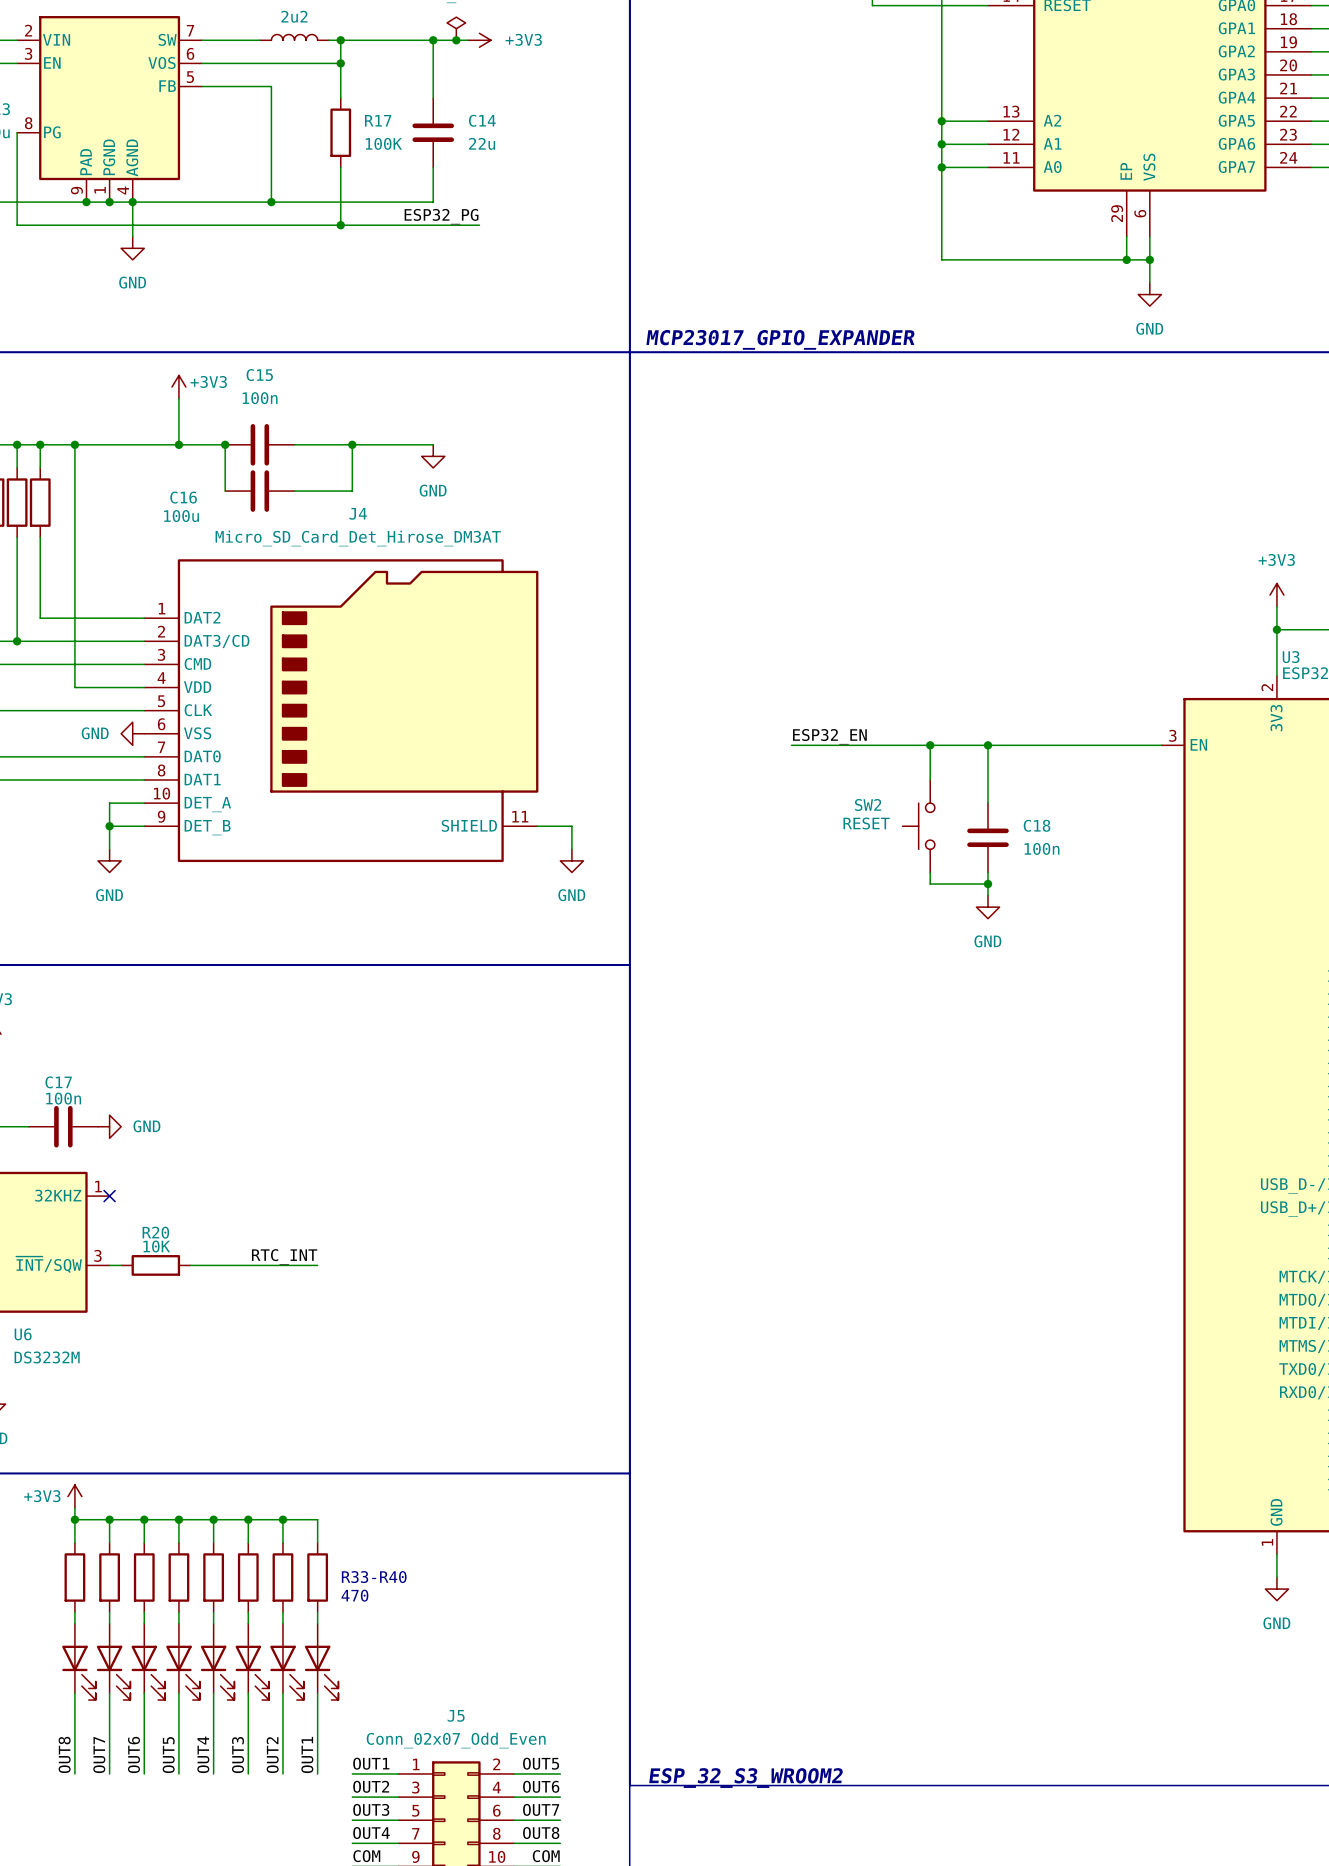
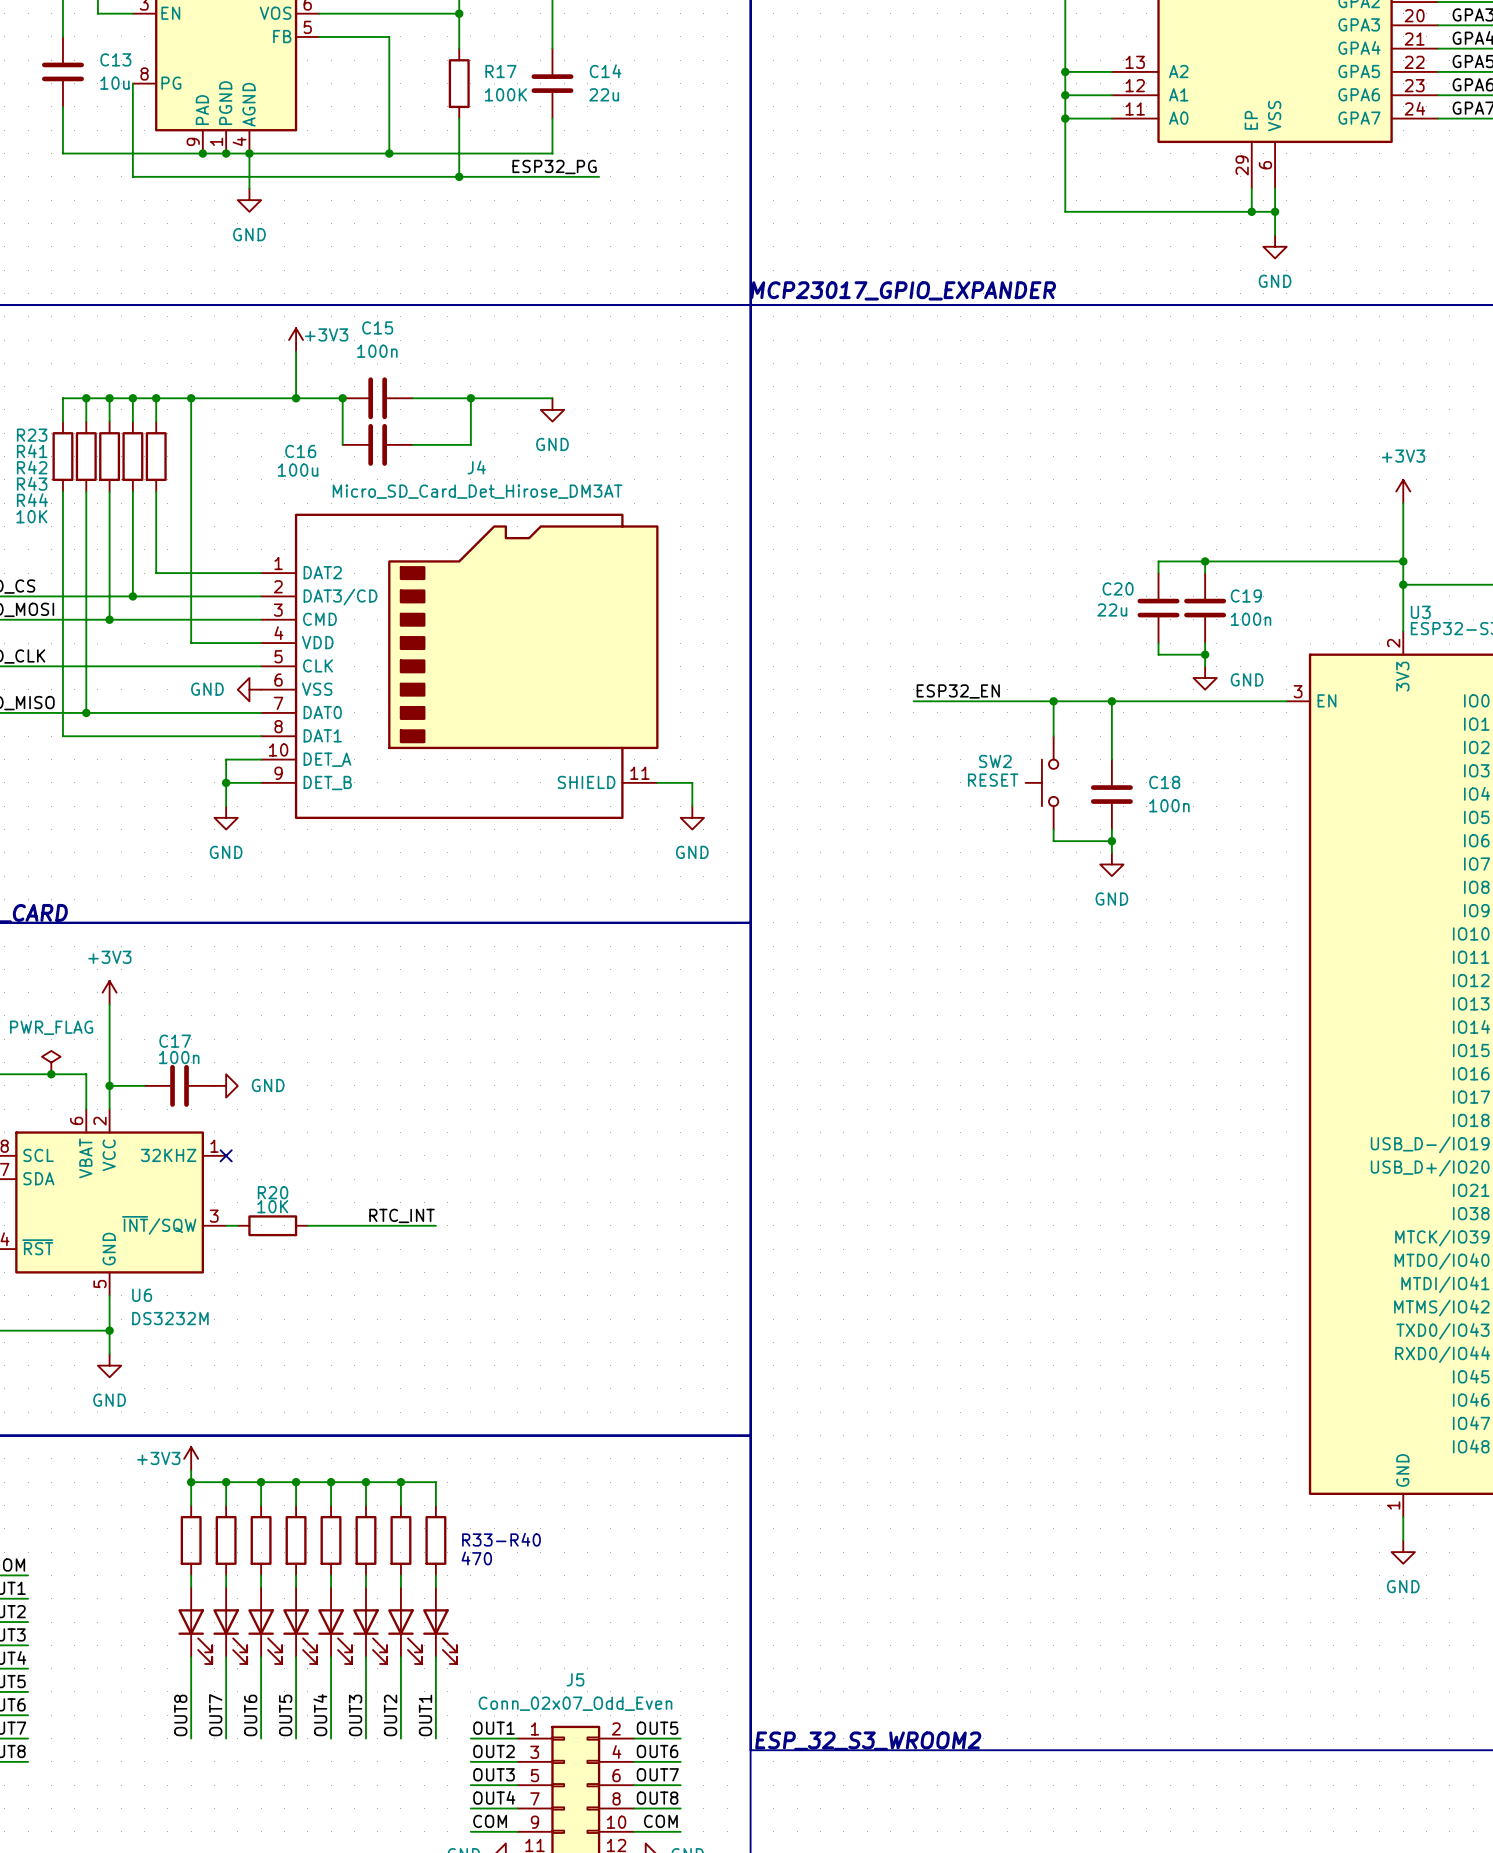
wire: none -> (1403, 503) (1403, 561) (1158, 561) (1158, 573)
power symbol position: +3V3 (1276, 595) -> +3V3 (1403, 491)
wire: none -> (1205, 561) (1205, 573)
junction: none -> (1205, 561)
junction: none -> (1403, 561)
C20: none -> 22u (1158, 608)
C19: none -> 100n (1205, 608)
wire: none -> (1158, 643) (1158, 654) (1205, 654)
wire: none -> (1205, 643) (1205, 666)
junction: none -> (1205, 654)
power symbol: none -> GND (1205, 677)

